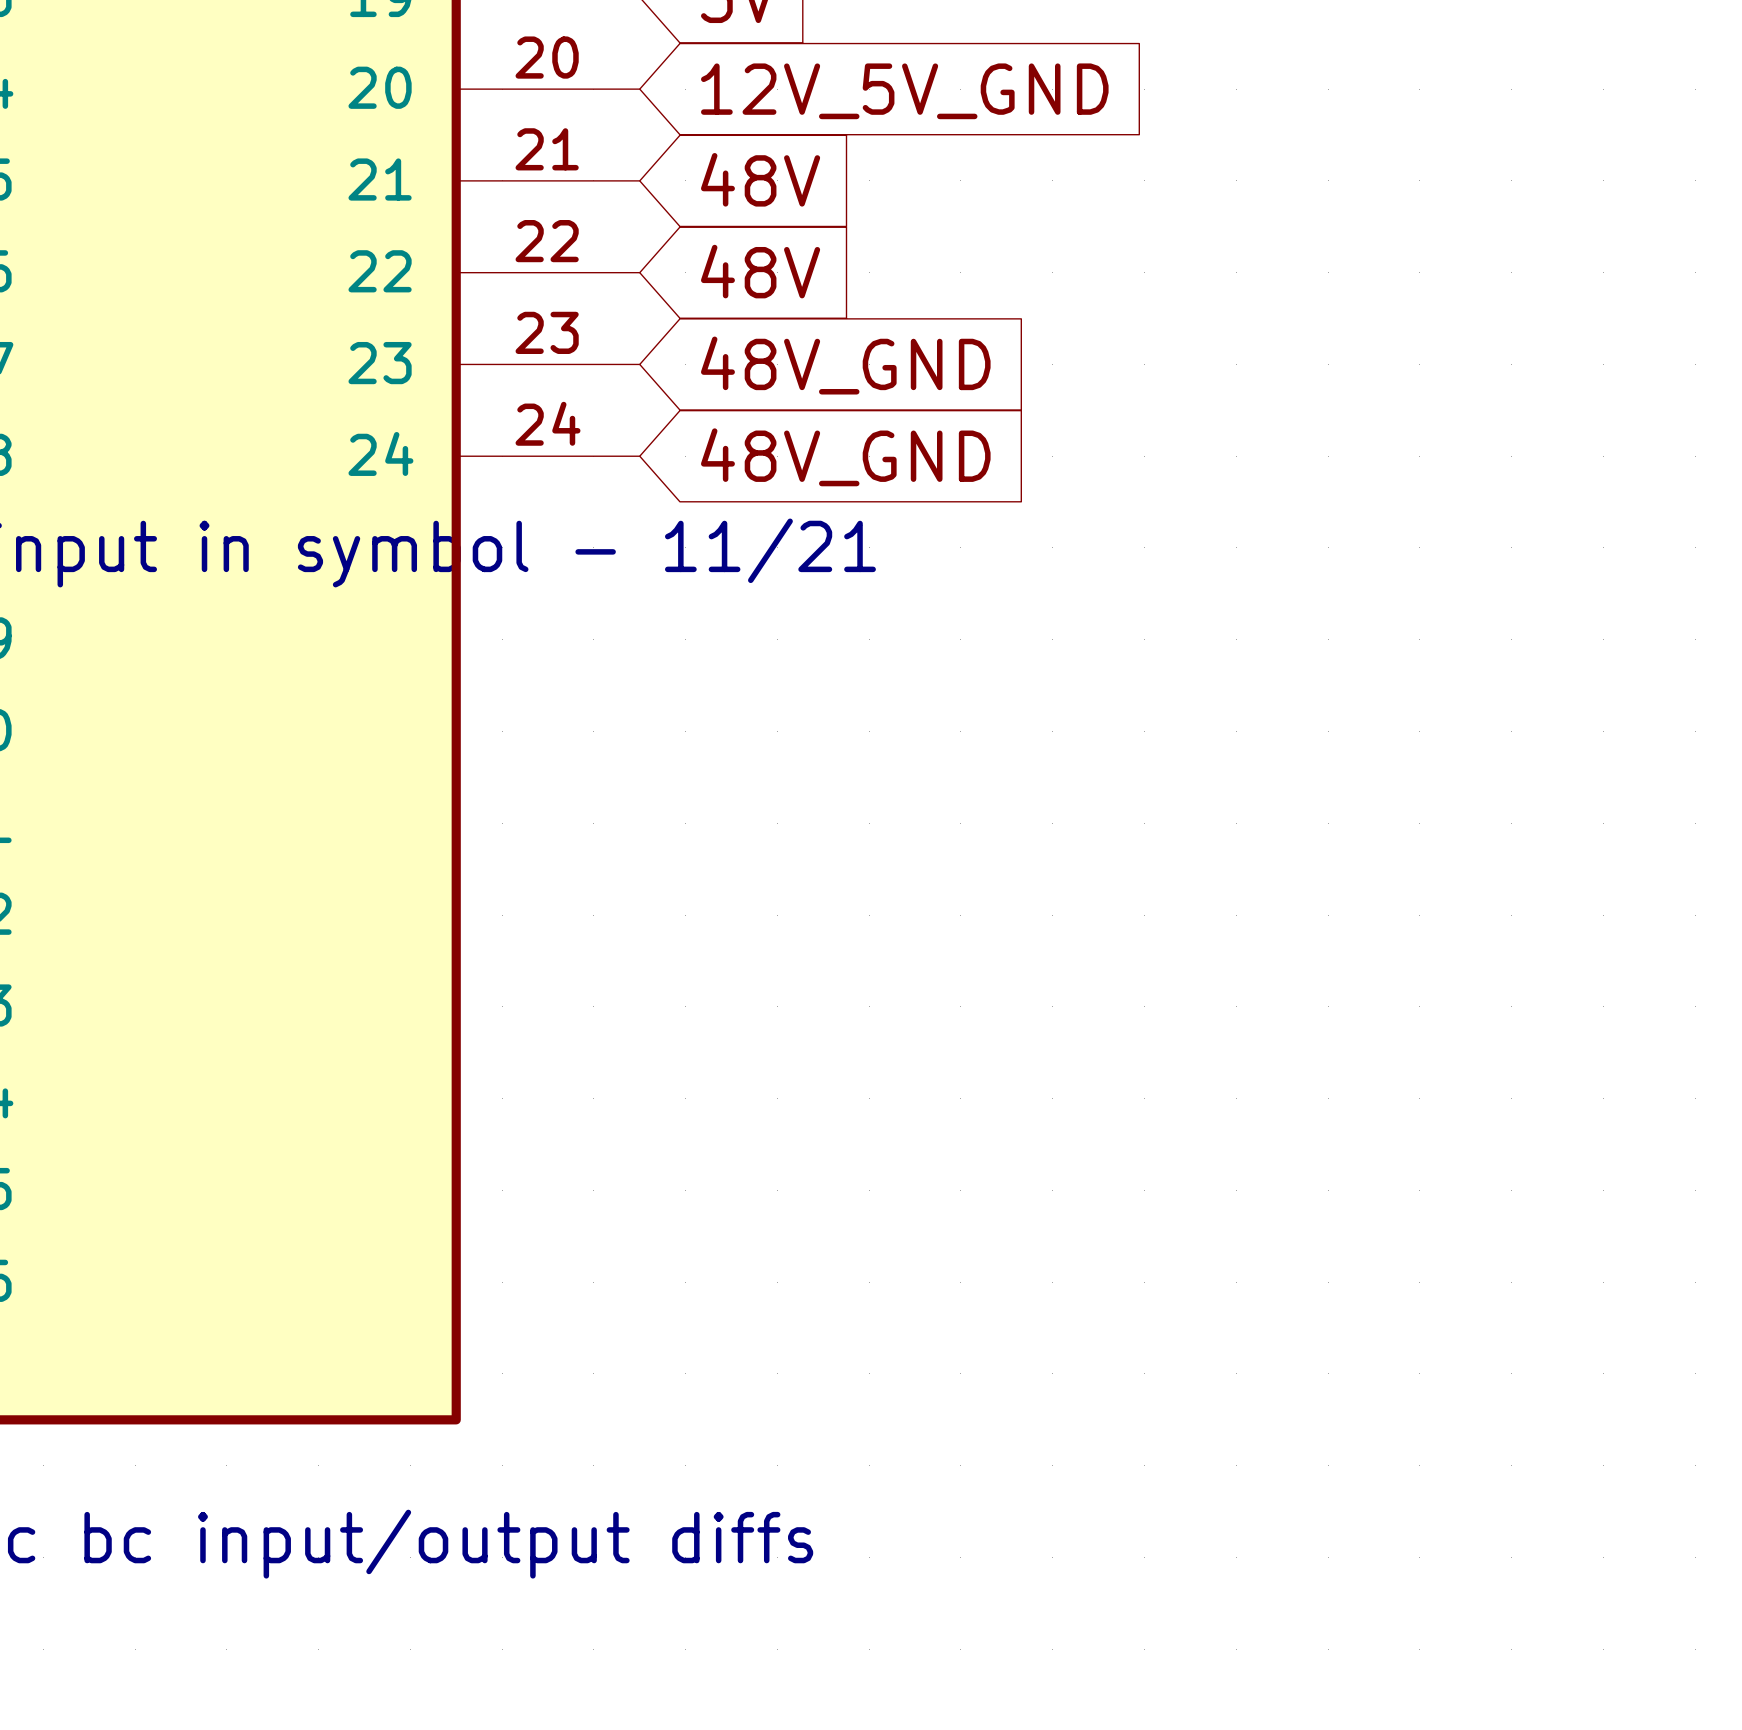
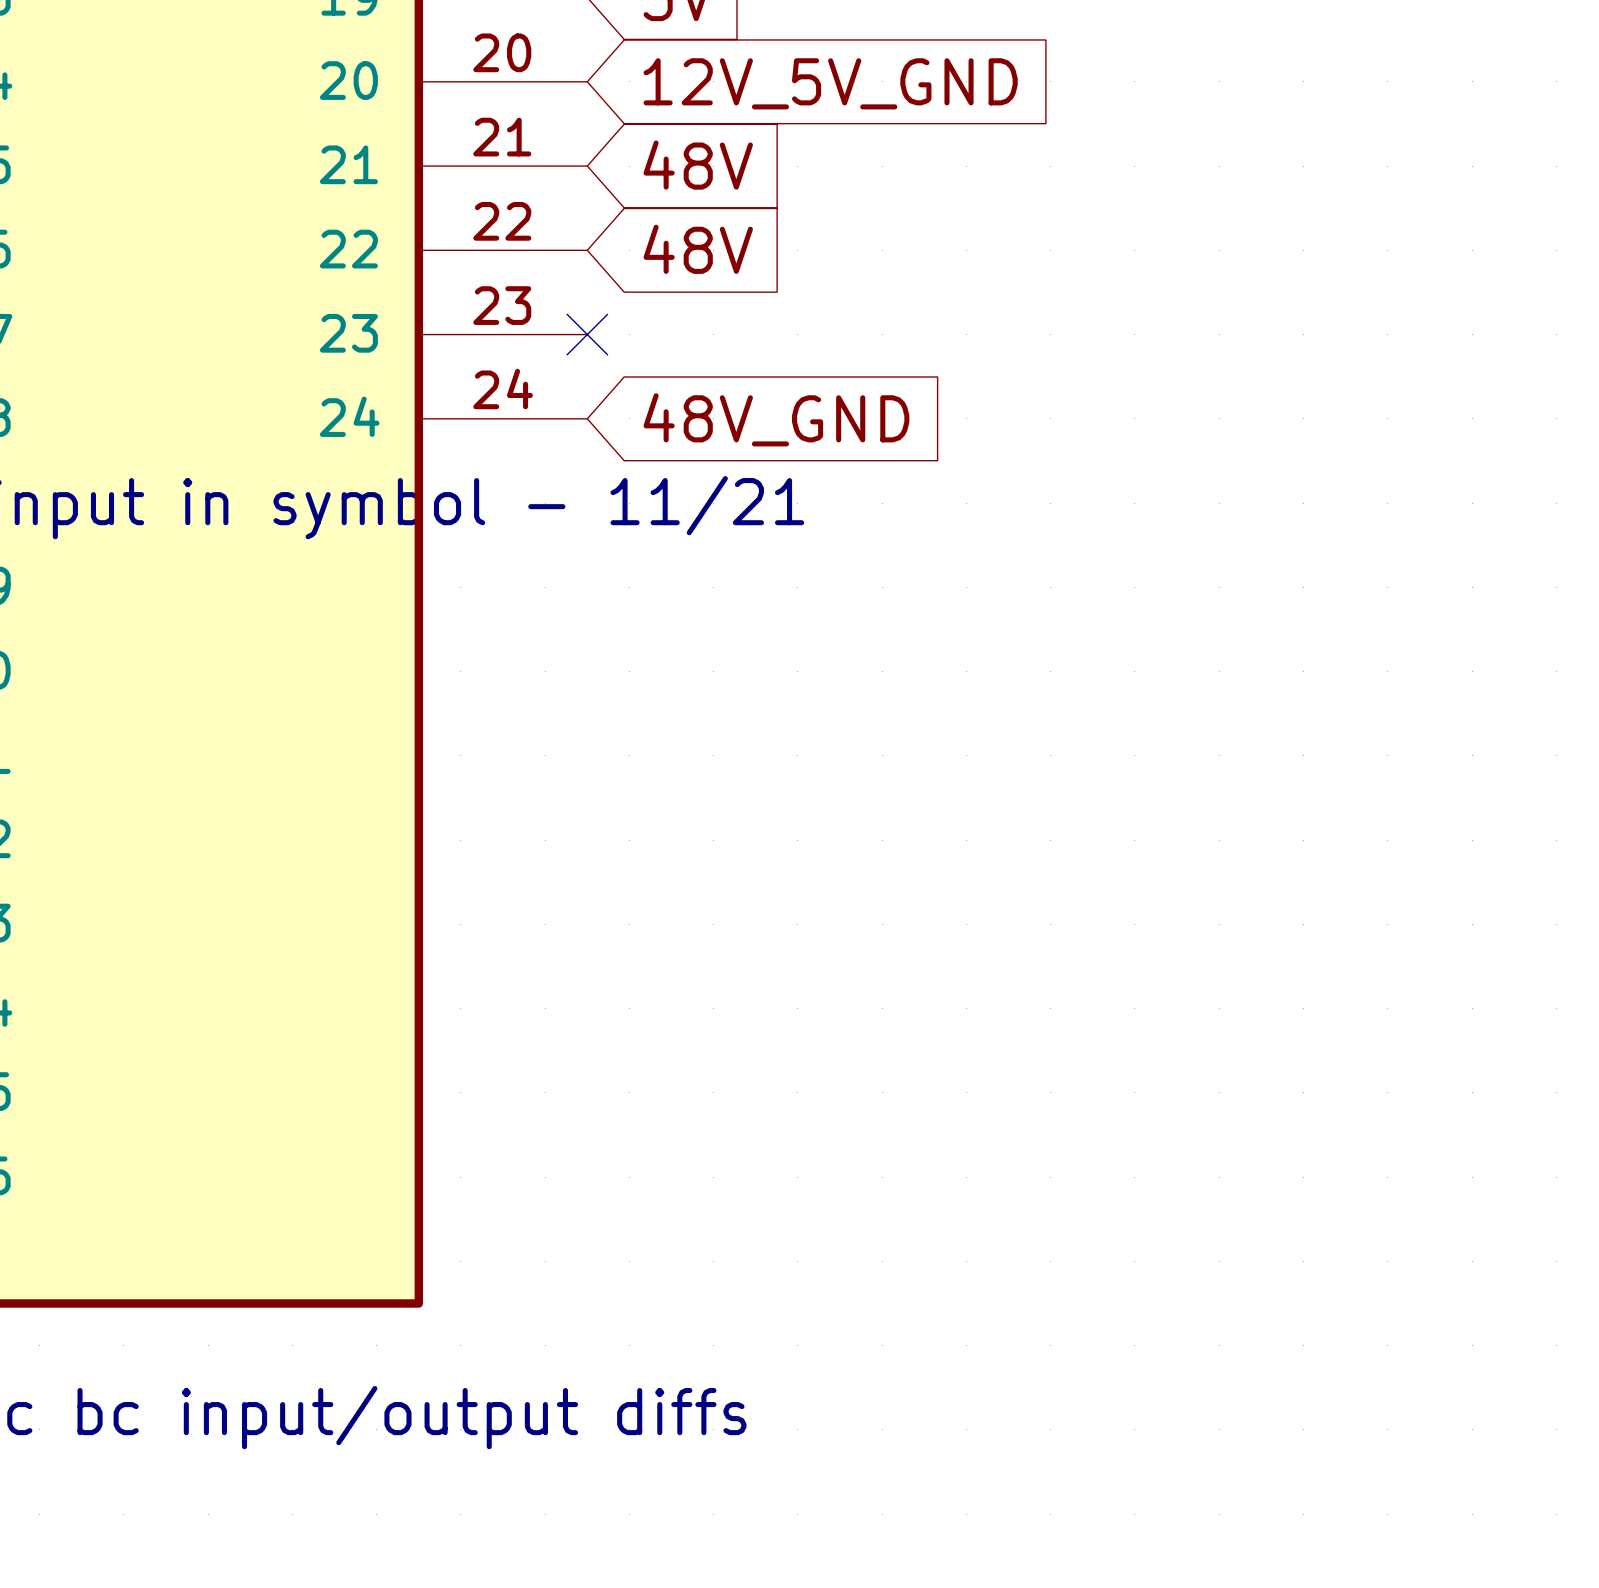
no-connect mark: none -> (587, 334)
global label: 48V_GND (845, 365) -> none

